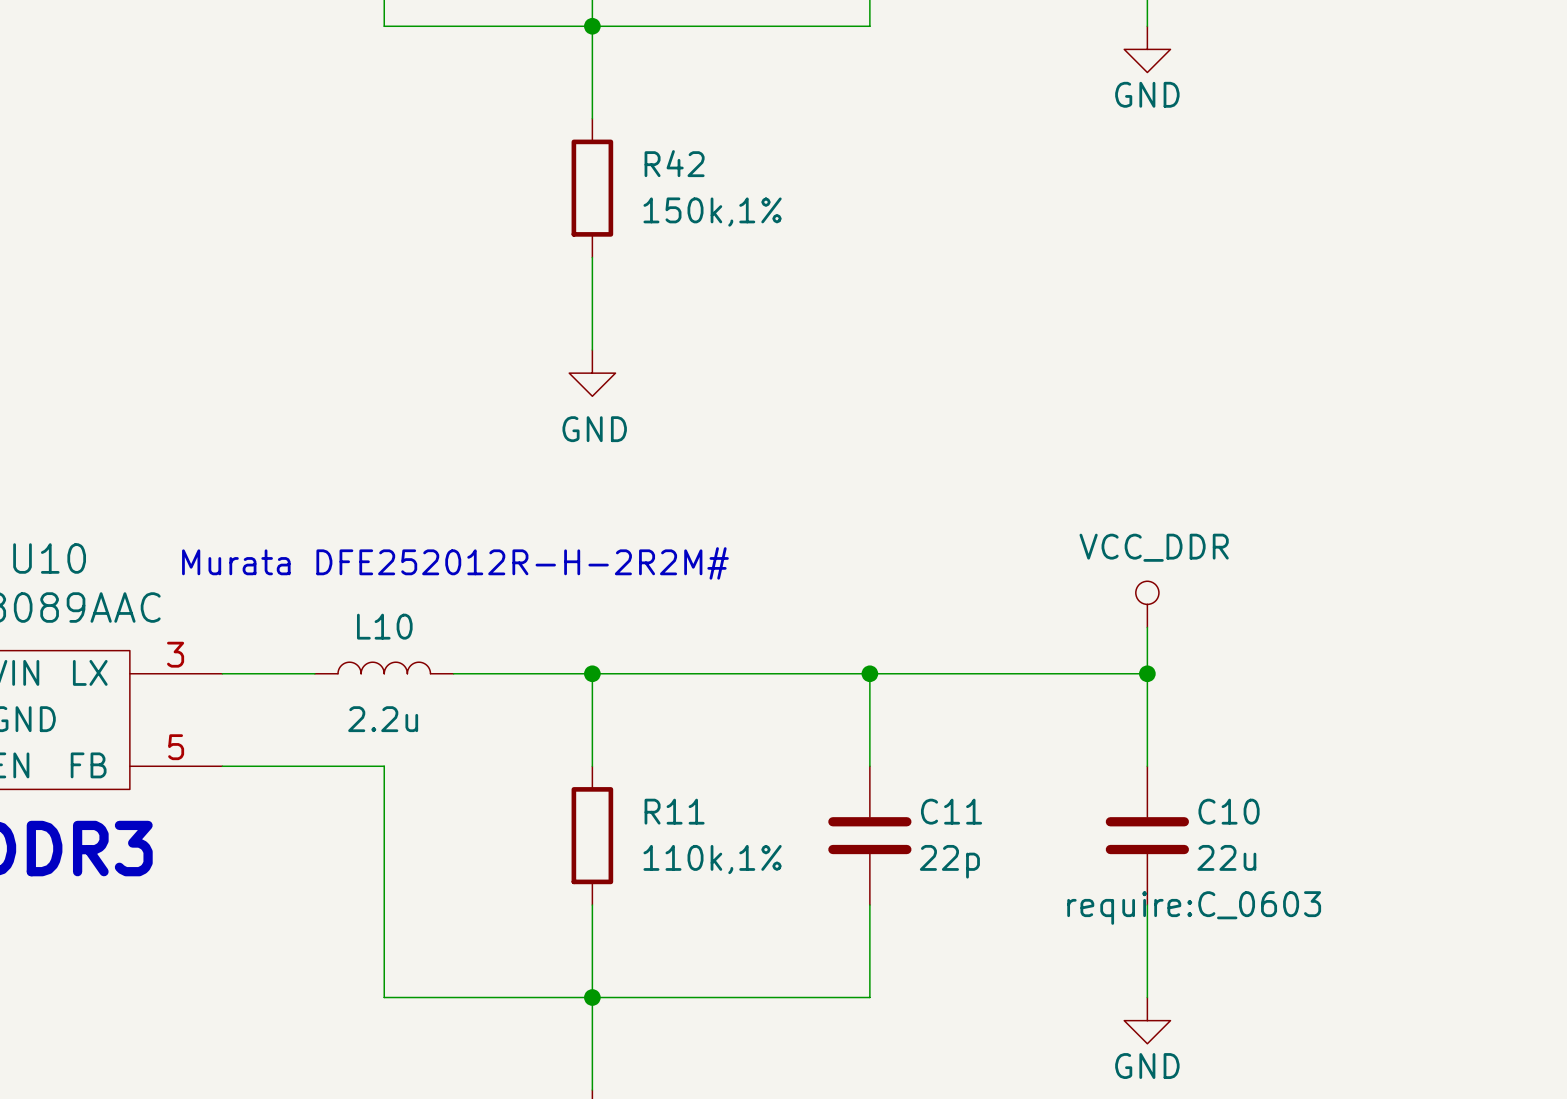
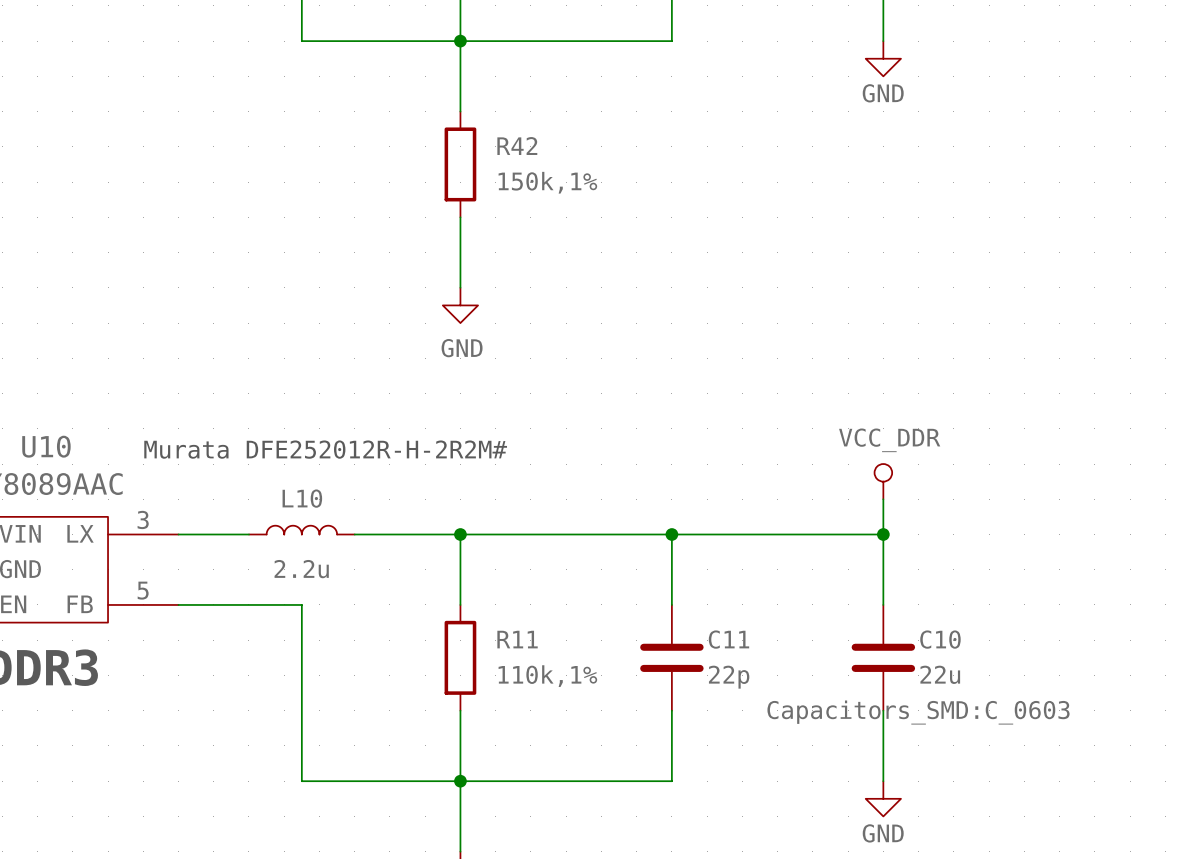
C10 text: require:C_0603 (1194, 908) -> Capacitors_SMD:C_0603 (918, 712)

